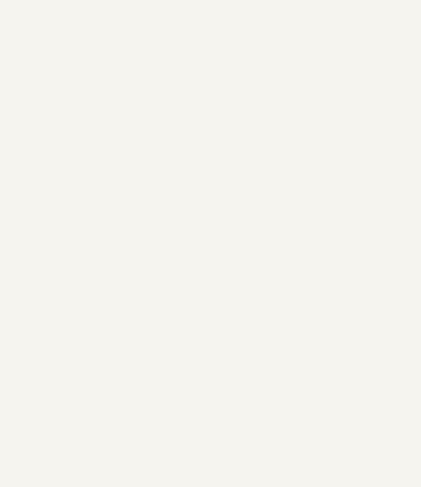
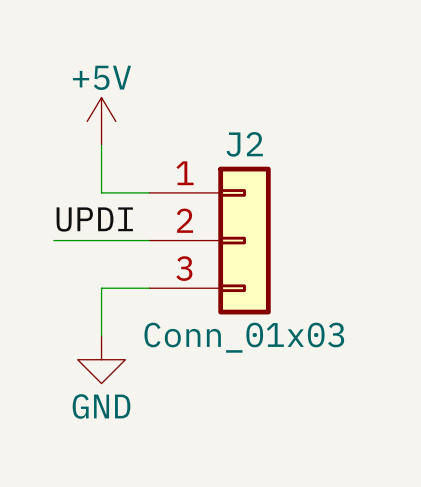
power symbol: none -> +5V (101, 121)
wire: none -> (101, 145) (101, 192) (149, 192)
label: none -> UPDI (94, 219)
wire: none -> (53, 240) (149, 240)
J2: none -> Conn_01x03 (209, 240)
wire: none -> (149, 288) (101, 288) (101, 335)
power symbol: none -> GND (101, 359)

